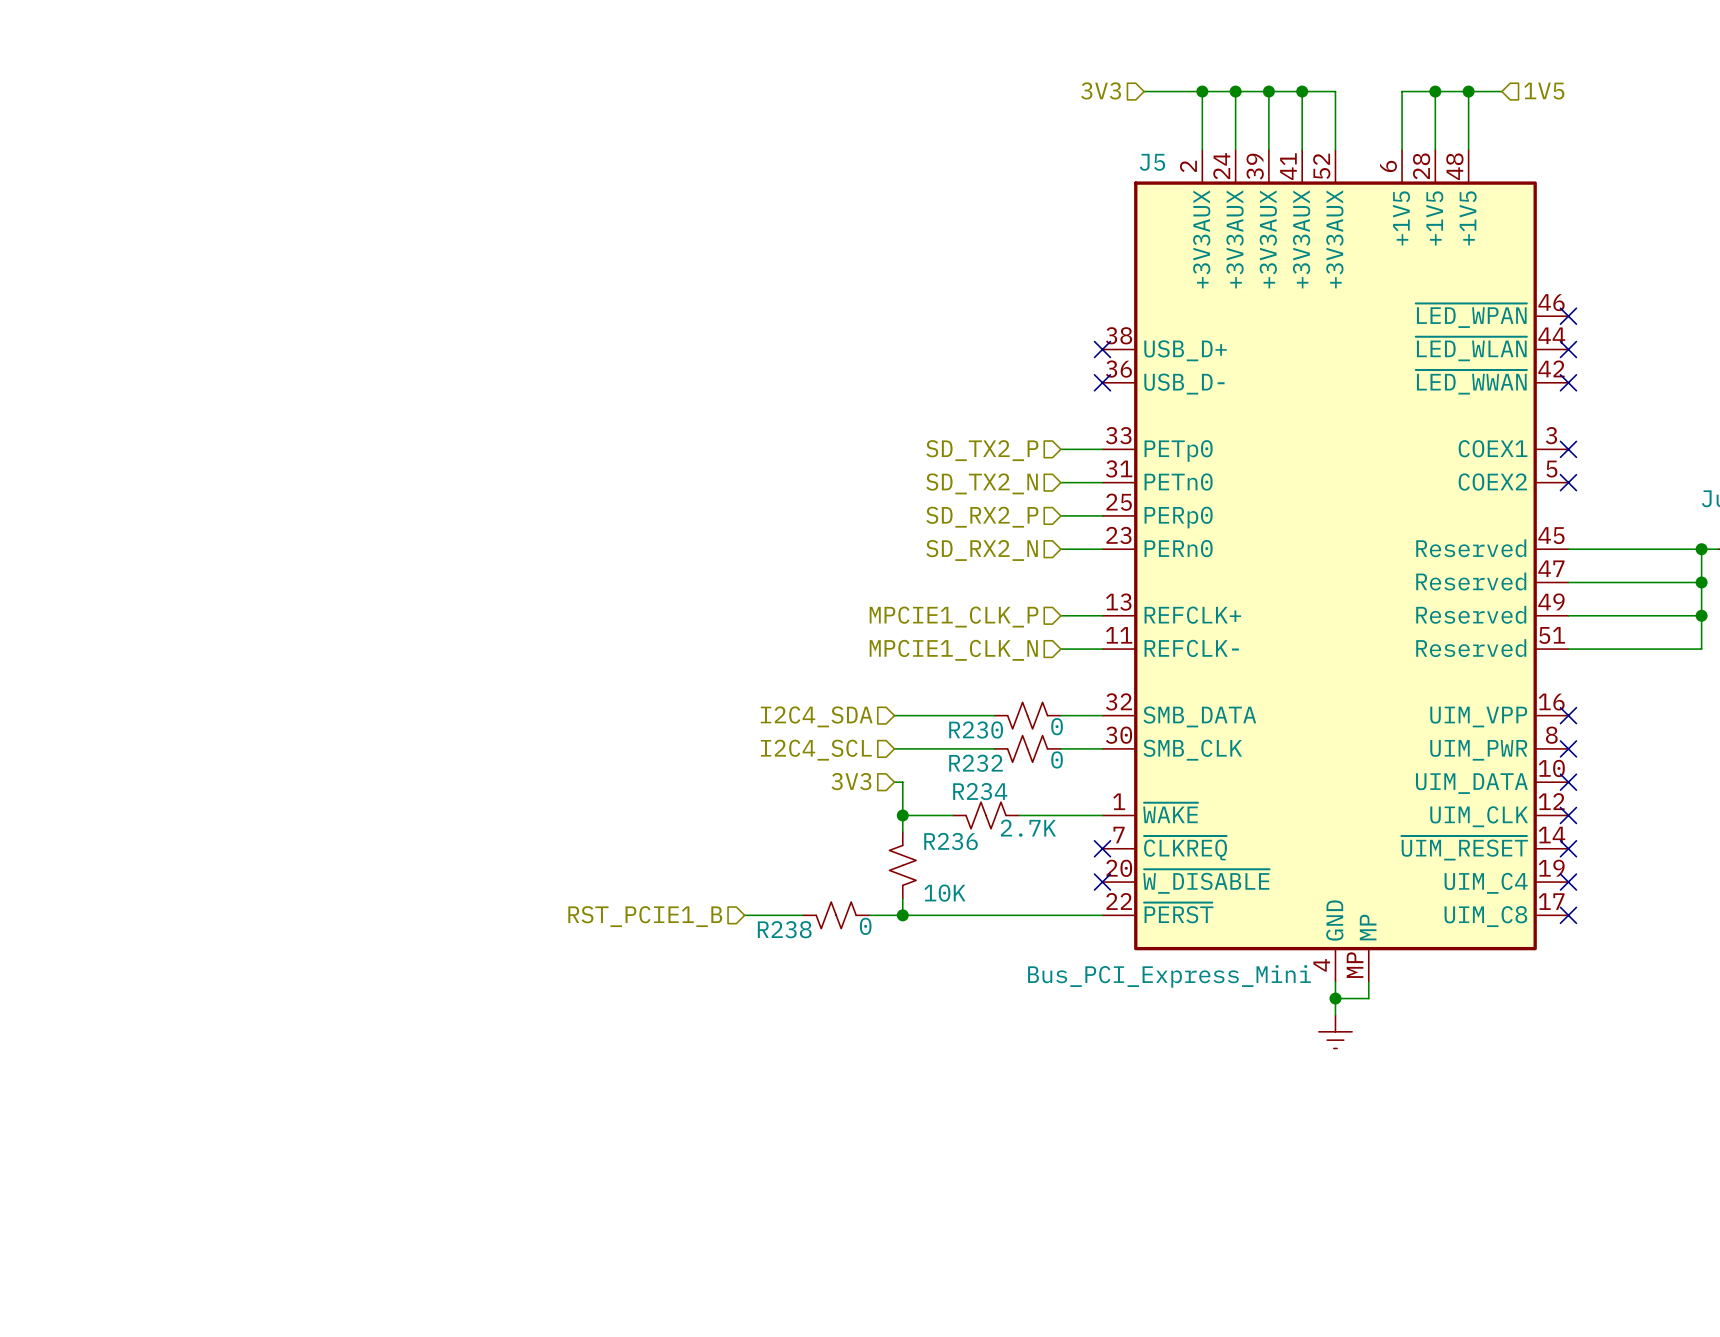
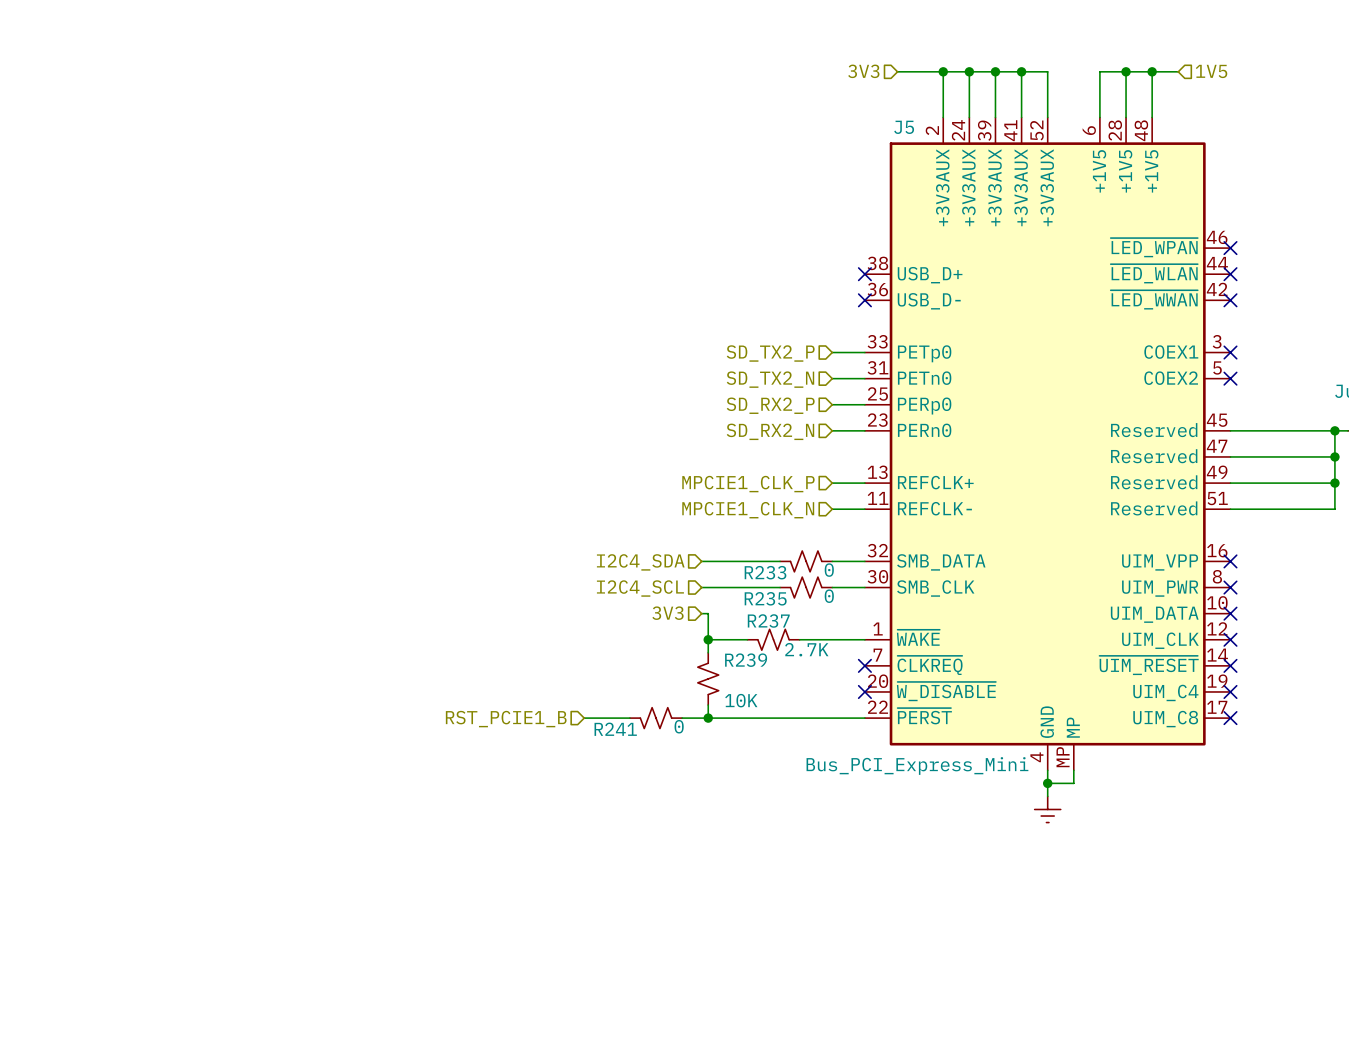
R230 name: R230 (976, 729) -> R233 (765, 572)
R232 name: R232 (976, 763) -> R235 (765, 598)
R234 name: R234 (980, 791) -> R237 (768, 620)
R236 name: R236 (951, 841) -> R239 (746, 660)
R238 name: R238 (784, 929) -> R241 (615, 729)

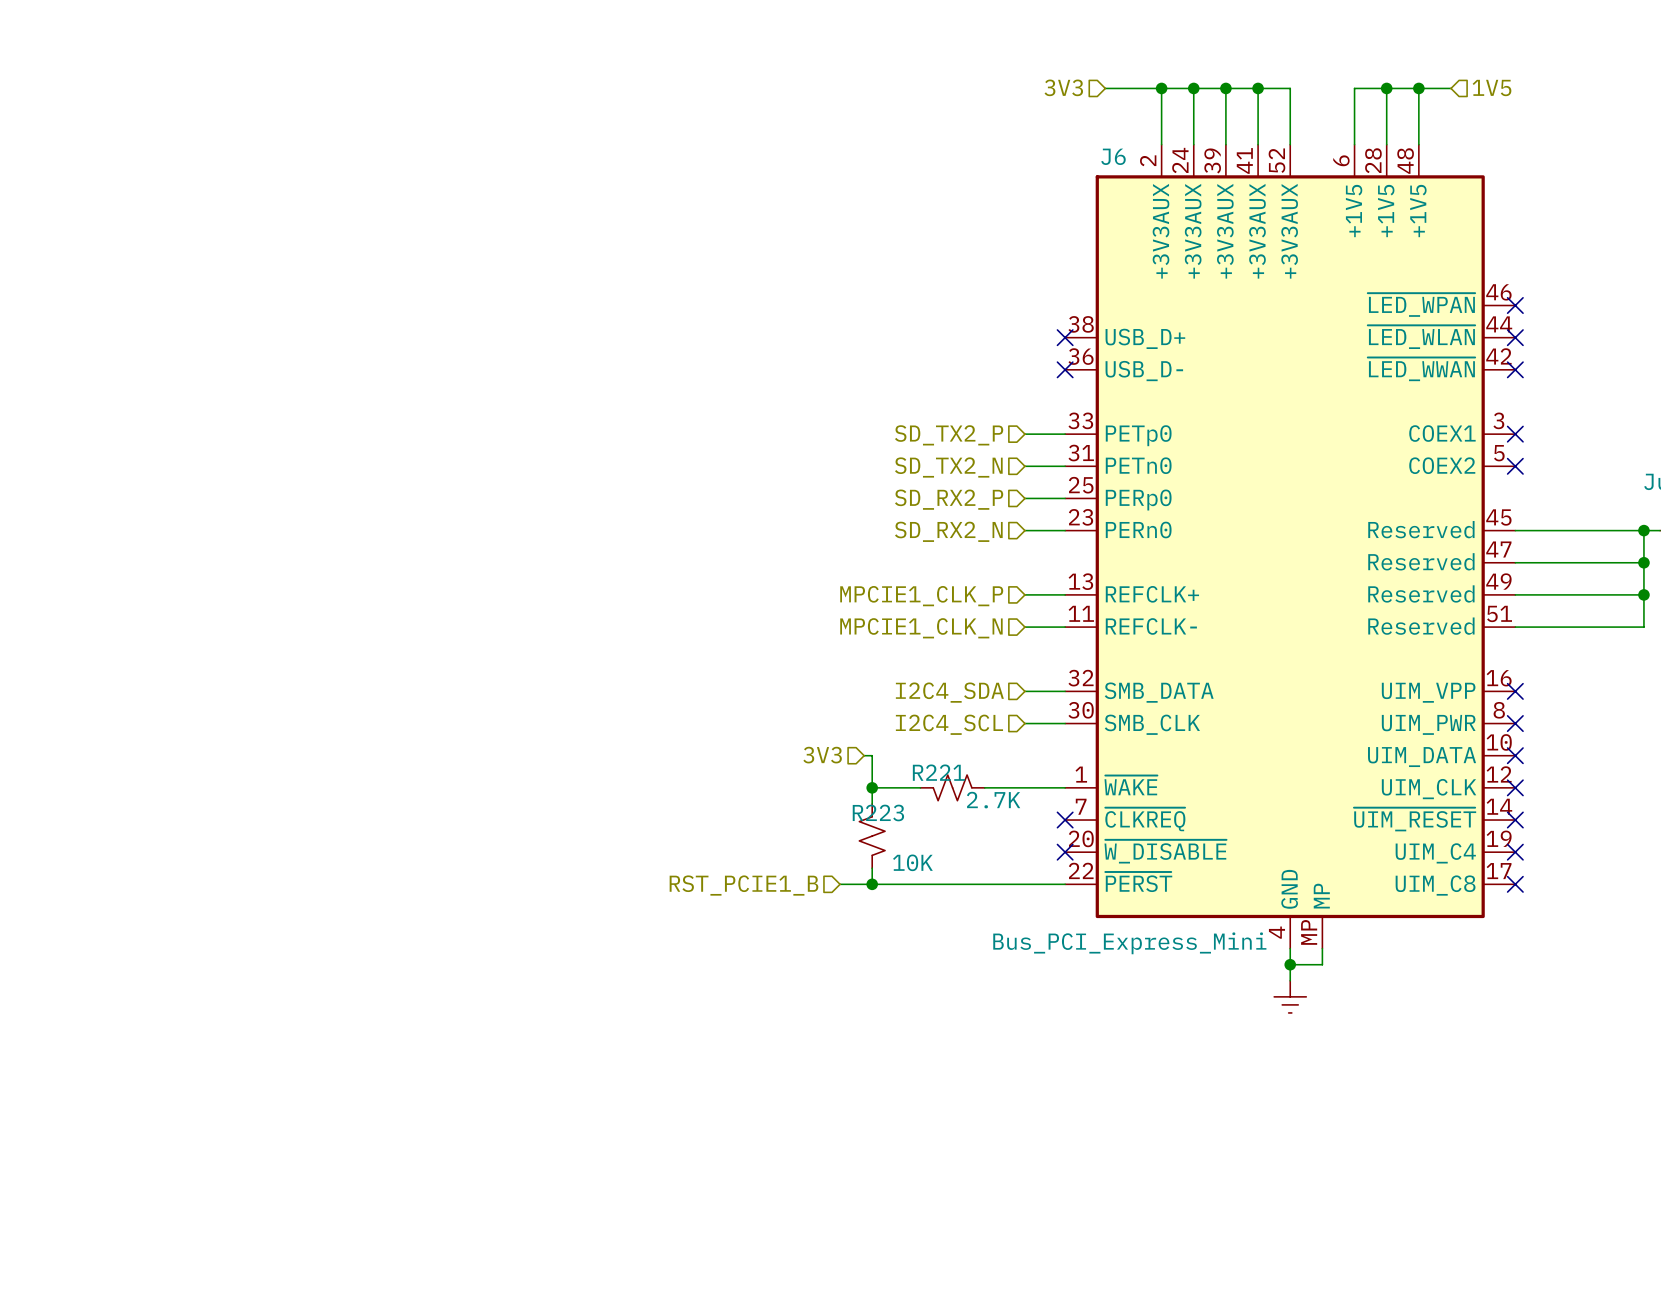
J5 name: J5 (904, 127) -> J6 (1113, 156)
wire: (701, 561) (780, 561) -> none
R233: 0 (806, 561) -> none
hierarchical label position: I2C4_SDA (640, 562) -> I2C4_SDA (949, 692)
wire: (701, 587) (780, 587) -> none
R235: 0 (806, 587) -> none
hierarchical label position: I2C4_SCL (640, 588) -> I2C4_SCL (949, 724)
R237 name: R237 (768, 620) -> R221 (938, 772)
R239 name: R239 (746, 660) -> R223 (878, 812)
wire: (584, 718) (629, 718) -> none
R241: 0 (656, 718) -> none
hierarchical label position: RST_PCIE1_B (506, 719) -> RST_PCIE1_B (743, 885)

